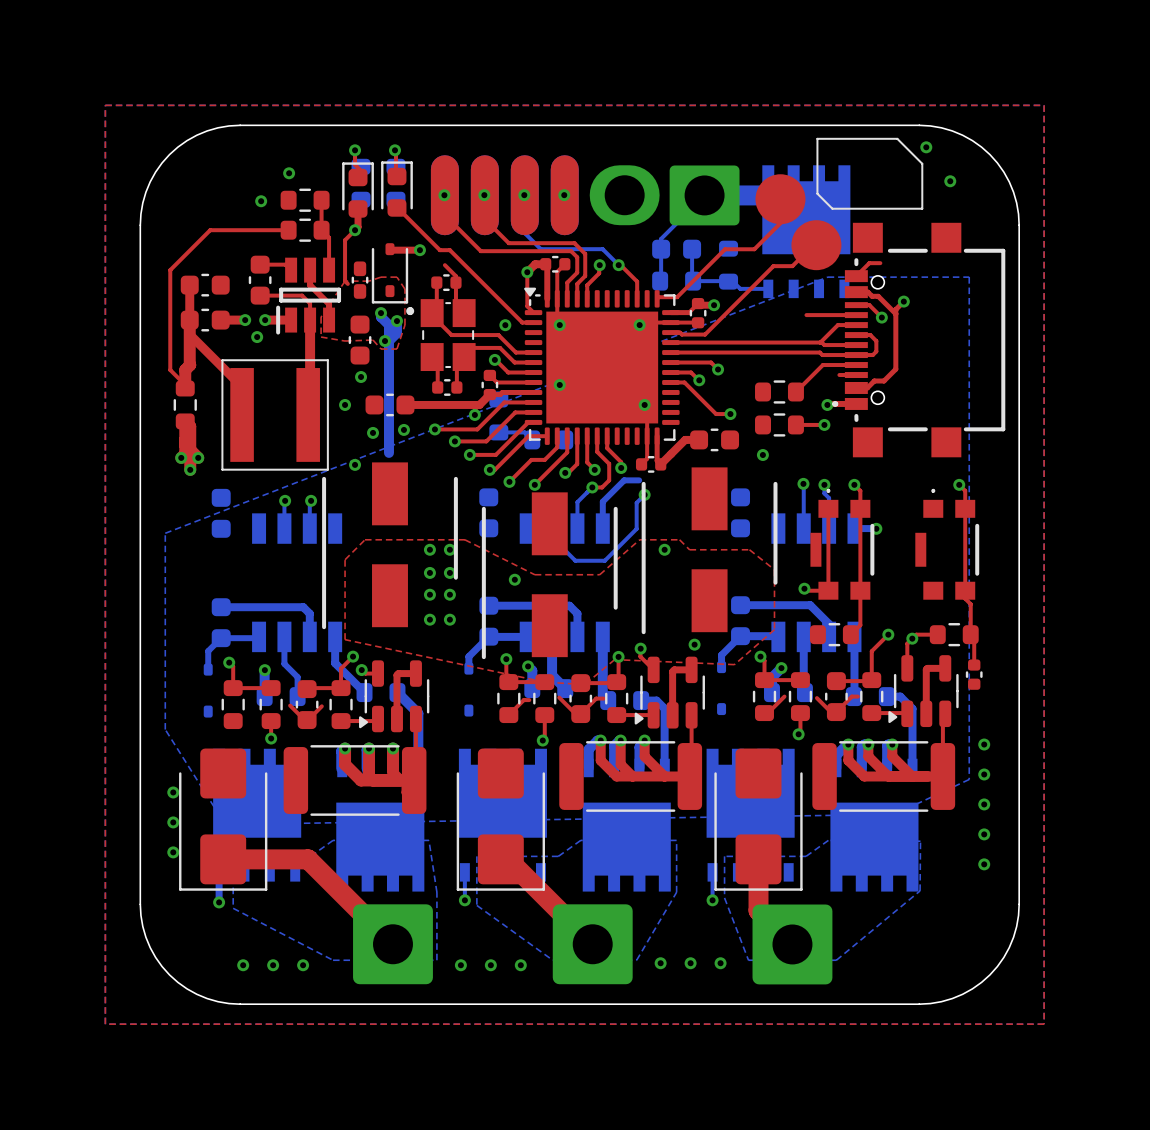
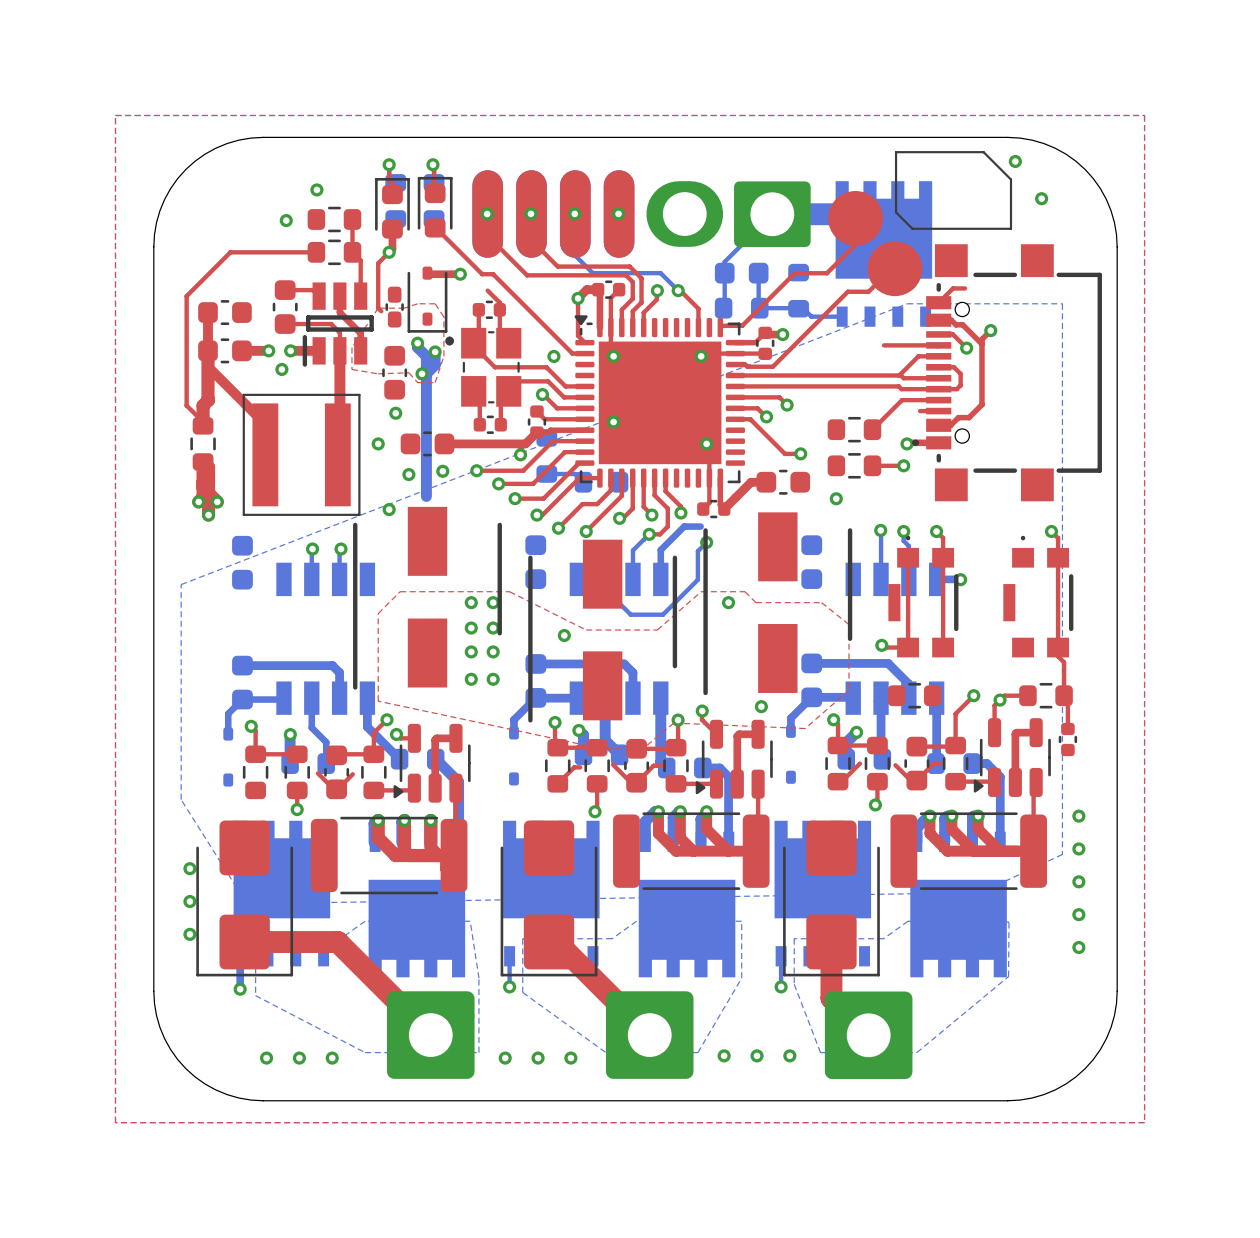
top track: (860, 590) (860, 625) (850, 634) -> none

